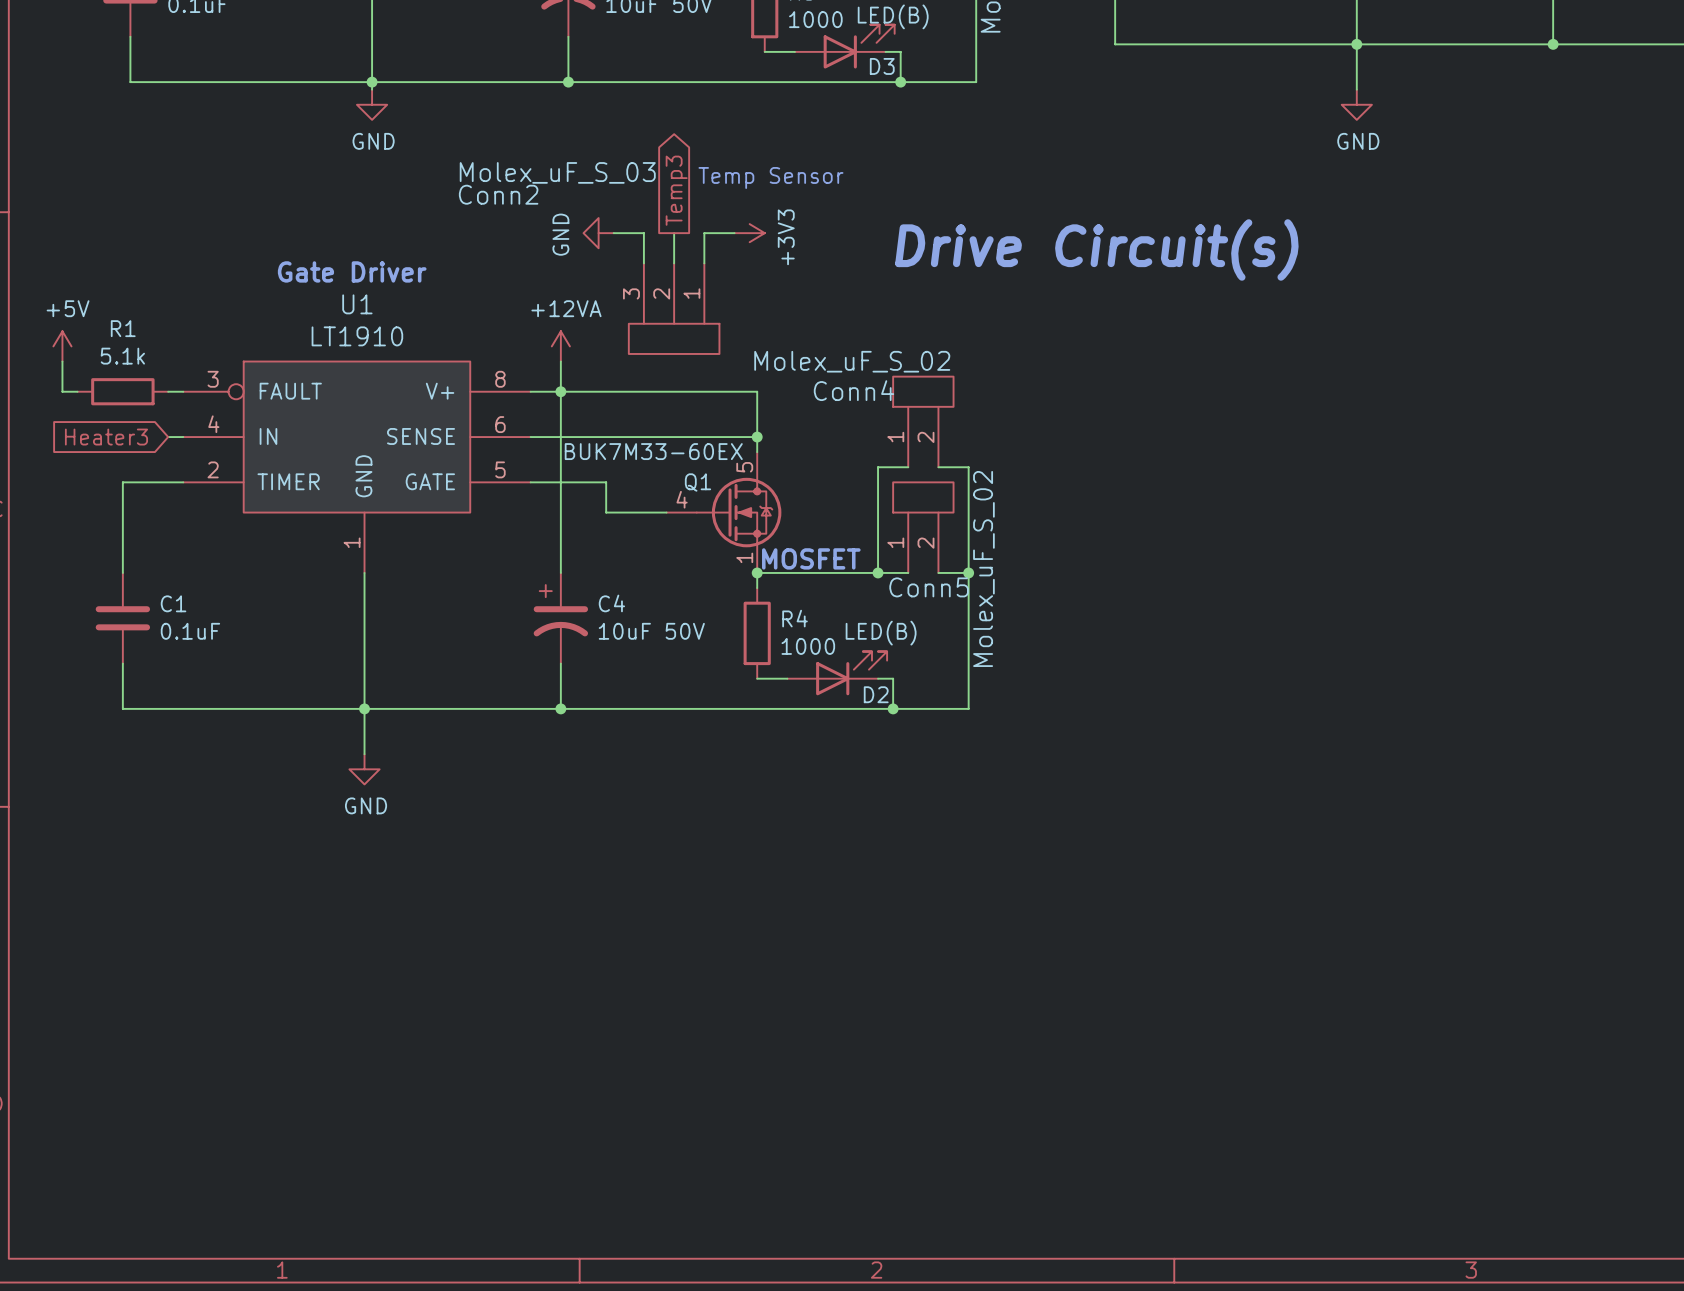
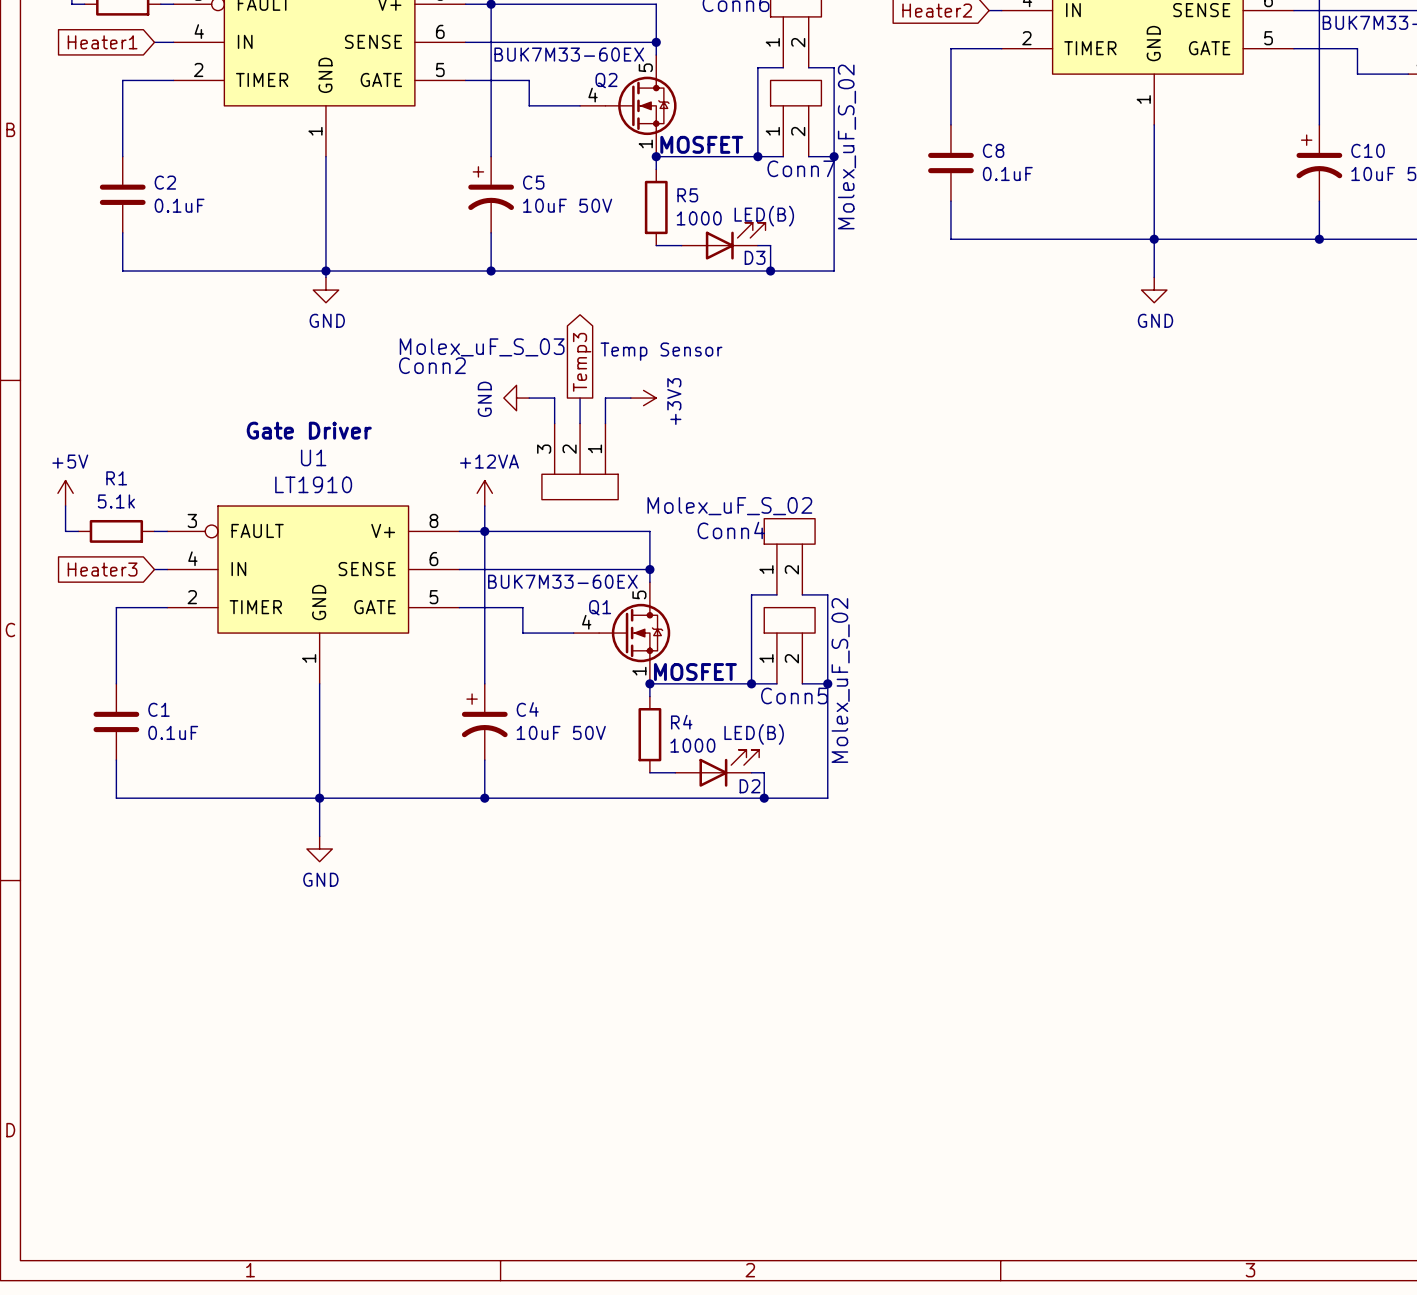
text: Drive Circuit(s) (1096, 249) -> none

